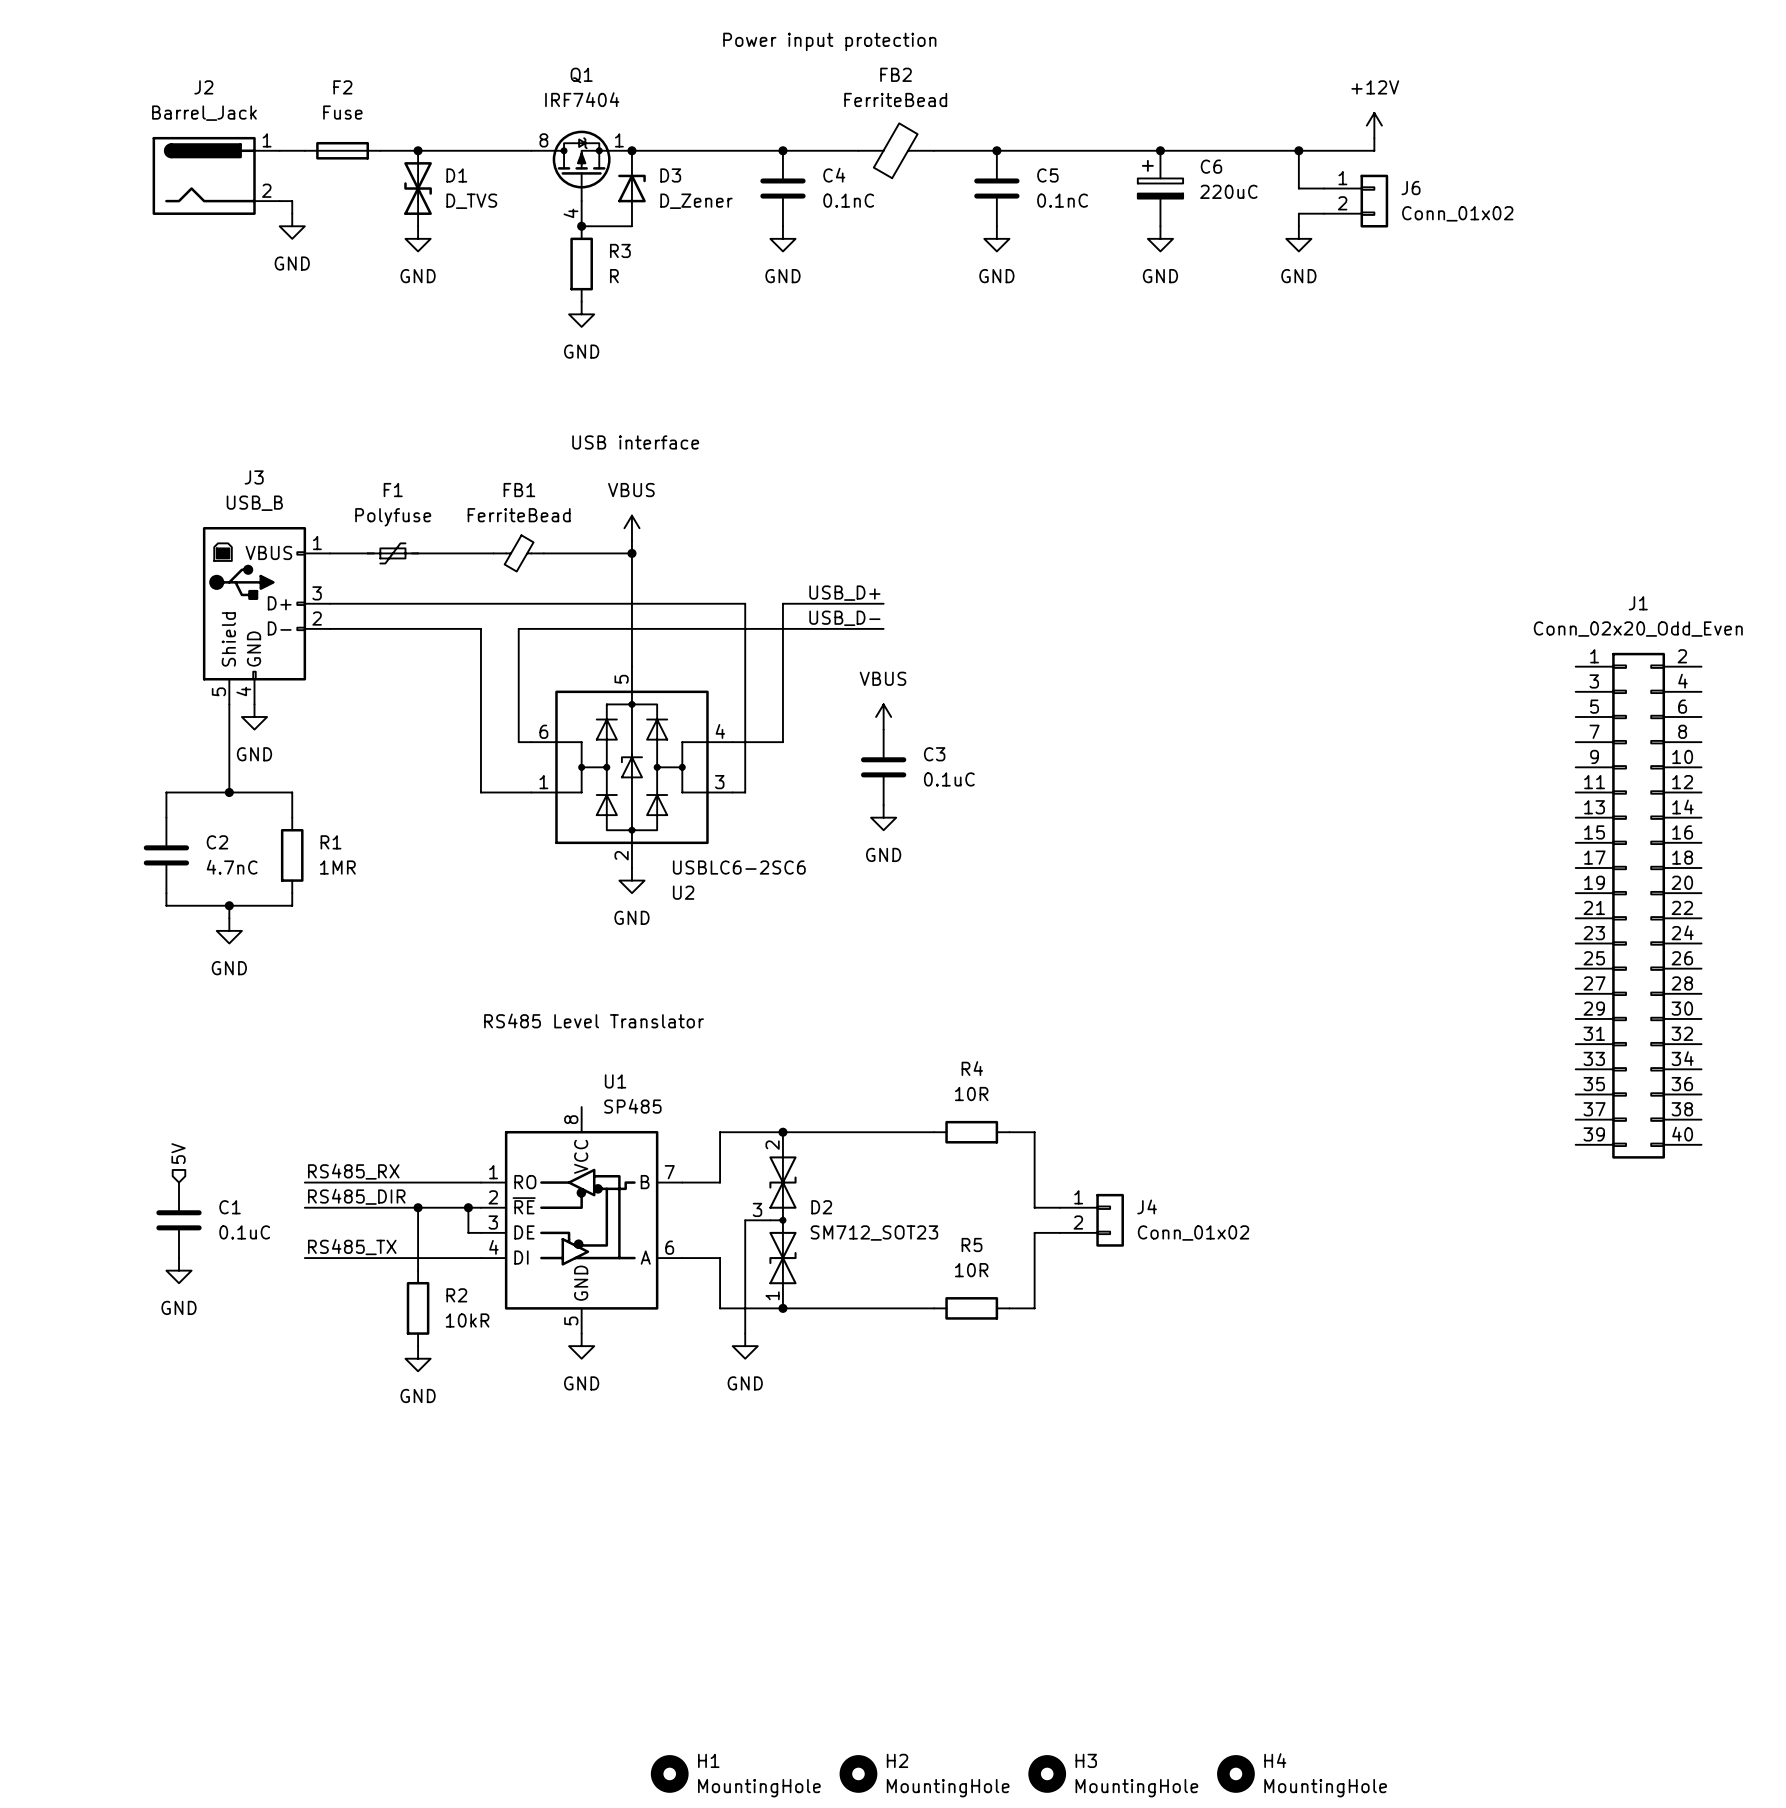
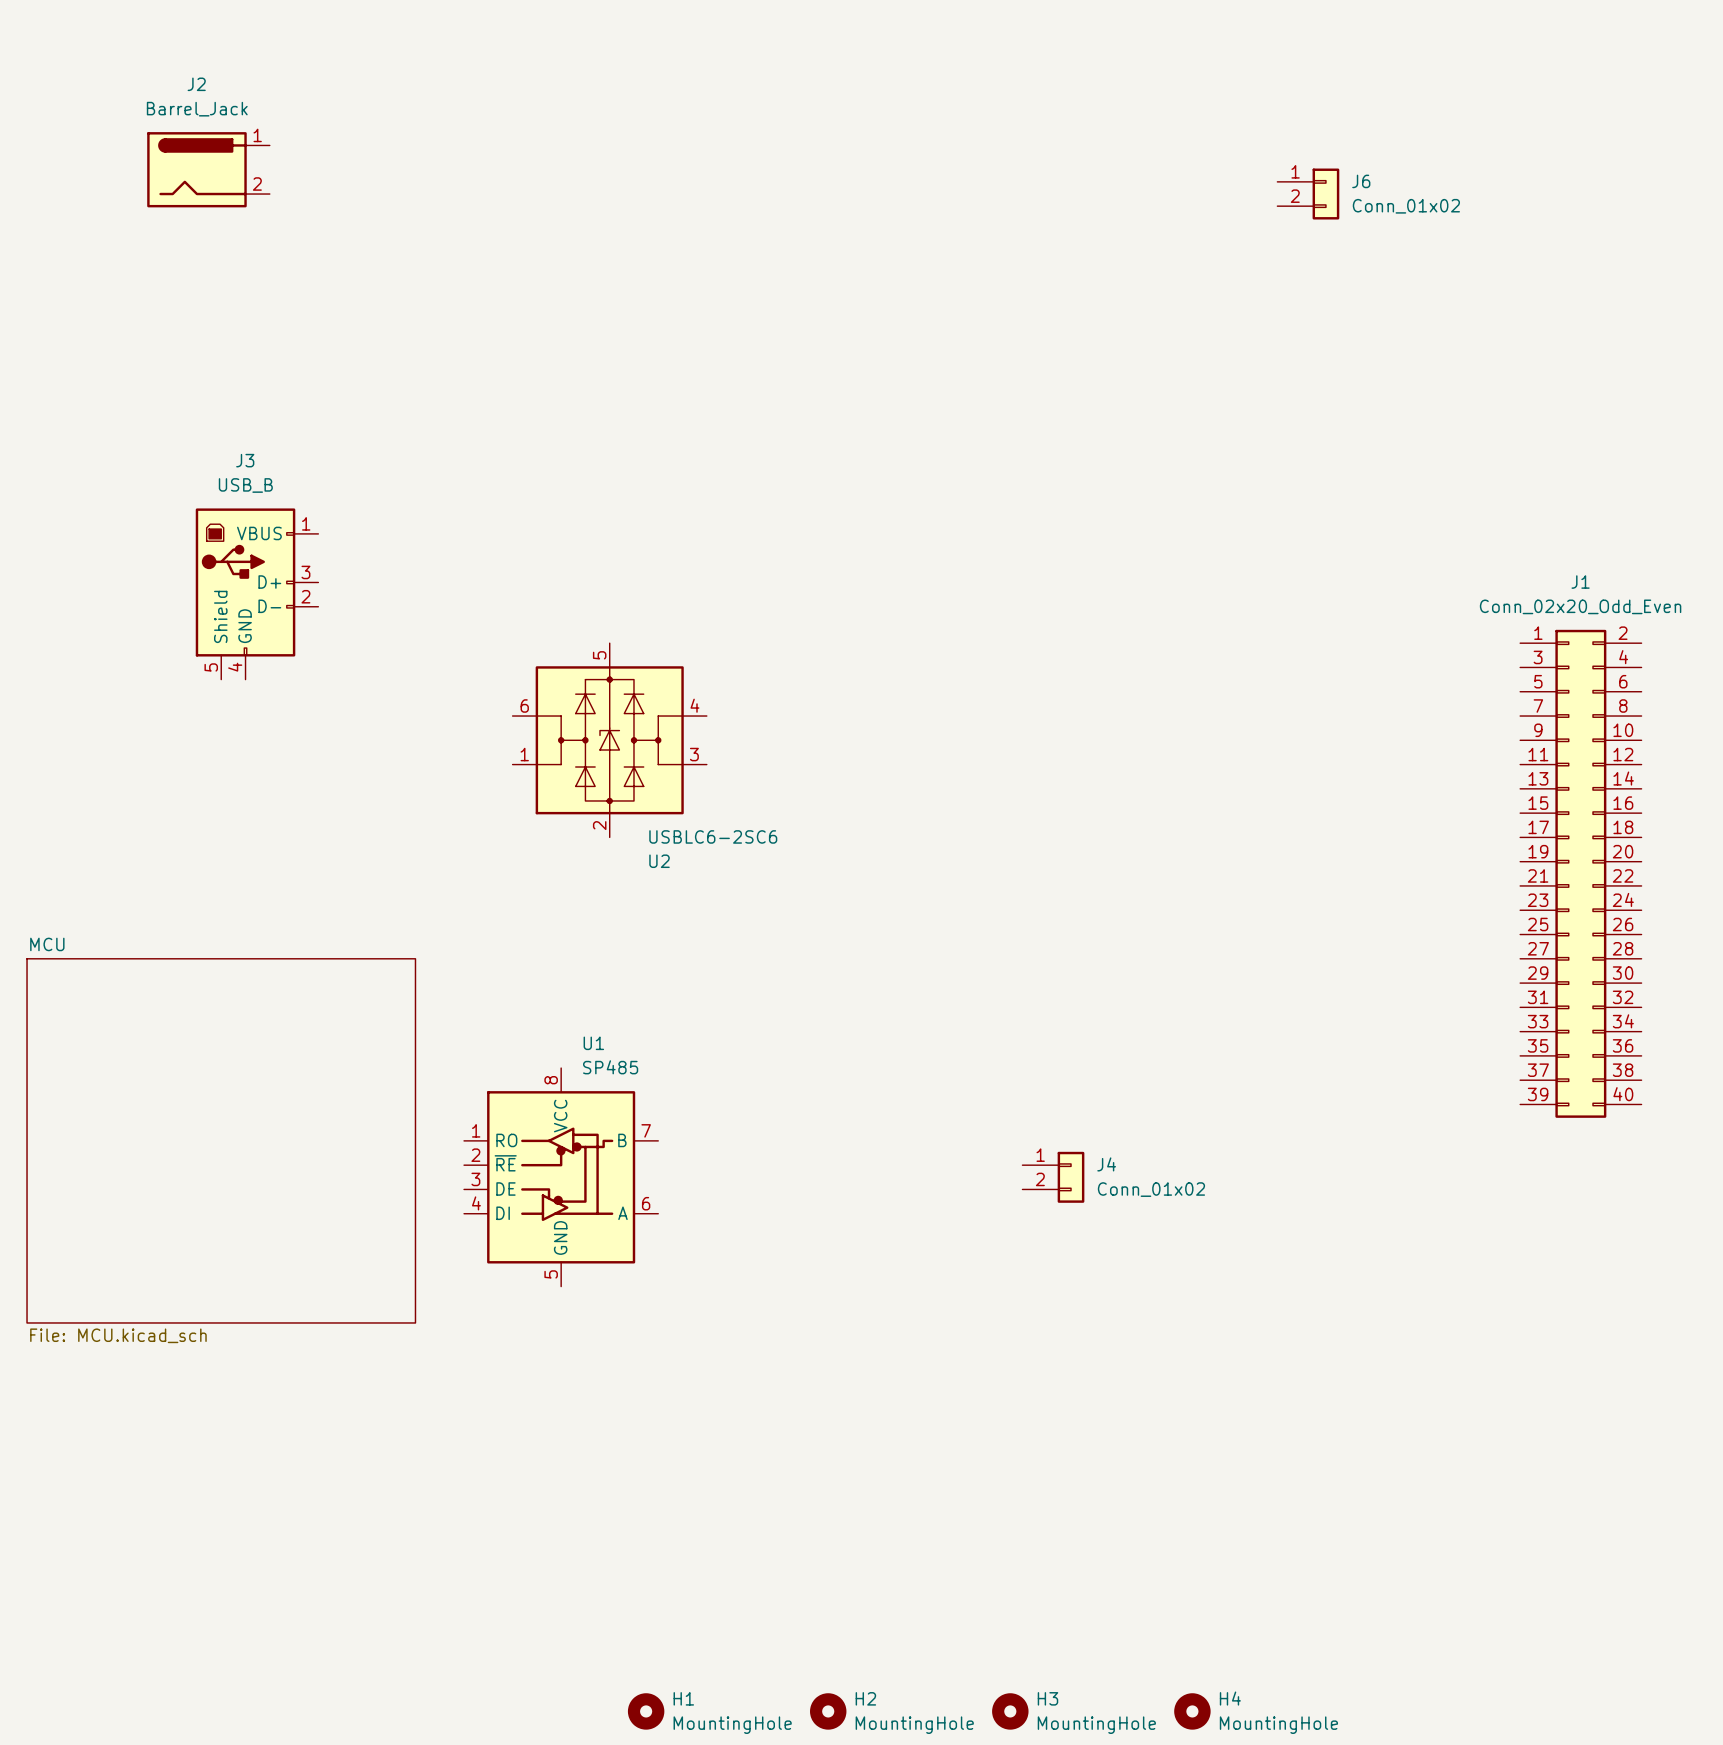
text: Power input protection (829, 41) -> none
power symbol: +12V (1374, 125) -> none
wire: (1374, 138) (1374, 150) (933, 150) -> none
wire: (279, 150) (304, 150) -> none
F2: Fuse (342, 150) -> none
wire: (380, 150) (531, 150) -> none
junction: (418, 150) -> none
wire: (631, 150) (858, 150) -> none
junction: (631, 150) -> none
junction: (782, 150) -> none
FB2: FerriteBead (896, 150) -> none
junction: (996, 150) -> none
junction: (1160, 150) -> none
wire: (1298, 150) (1298, 188) (1324, 188) -> none
junction: (1298, 150) -> none
Q1: IRF7404 (581, 178) -> none
D1: D_TVS (418, 188) -> none
D3: D_Zener (631, 188) -> none
C4: 0.1nC (782, 188) -> none
C5: 0.1nC (996, 188) -> none
C6: 220uC (1160, 188) -> none
wire: (279, 201) (292, 201) (292, 213) -> none
wire: (1324, 213) (1298, 213) (1298, 226) -> none
power symbol: GND (292, 226) -> none
wire: (581, 226) (631, 226) -> none
junction: (581, 226) -> none
power symbol: GND (418, 238) -> none
power symbol: GND (782, 238) -> none
power symbol: GND (996, 238) -> none
power symbol: GND (1160, 238) -> none
power symbol: GND (1298, 238) -> none
R3: R (581, 264) -> none
power symbol: GND (581, 314) -> none
text: USB interface (635, 442) -> none
power symbol: VBUS (631, 528) -> none
wire: (631, 540) (631, 666) -> none
wire: (329, 553) (367, 553) -> none
F1: Polyfuse (392, 553) -> none
wire: (418, 553) (493, 553) -> none
FB1: FerriteBead (518, 553) -> none
wire: (543, 553) (631, 553) -> none
junction: (631, 553) -> none
label: USB_D+ (844, 593) -> none
wire: (329, 603) (745, 603) (745, 792) (732, 792) -> none
wire: (883, 603) (782, 603) (782, 742) (732, 742) -> none
label: USB_D- (844, 618) -> none
wire: (329, 628) (480, 628) (480, 792) (531, 792) -> none
wire: (883, 628) (518, 628) (518, 742) (531, 742) -> none
wire: (229, 704) (229, 792) -> none
power symbol: GND (254, 717) -> none
power symbol: VBUS (883, 717) -> none
C3: 0.1uC (883, 767) -> none
junction: (229, 792) -> none
wire: (166, 817) (166, 792) (292, 792) (292, 817) -> none
power symbol: GND (883, 817) -> none
C2: 4.7nC (166, 855) -> none
R1: 1MR (292, 855) -> none
power symbol: GND (631, 880) -> none
wire: (166, 893) (166, 905) (292, 905) (292, 893) -> none
wire: (229, 905) (229, 918) -> none
junction: (229, 905) -> none
power symbol: GND (229, 930) -> none
text: RS485 Level Translator (594, 1020) -> none
junction: (782, 1132) -> none
wire: (933, 1132) (720, 1132) (720, 1182) (682, 1182) -> none
R4: 10R (971, 1132) -> none
wire: (1009, 1132) (1034, 1132) (1034, 1207) (1059, 1207) -> none
hierarchical label: 5V (178, 1153) -> none
label: RS485_RX (353, 1171) -> none
sheet MCU: none -> File: MCU.kicad_sch (221, 1140)
wire: (304, 1182) (480, 1182) -> none
label: RS485_DIR (356, 1196) -> none
wire: (304, 1207) (480, 1207) -> none
wire: (418, 1207) (418, 1270) -> none
junction: (418, 1207) -> none
wire: (468, 1207) (468, 1232) (480, 1232) -> none
junction: (468, 1207) -> none
C1: 0.1uC (179, 1220) -> none
wire: (745, 1220) (745, 1333) -> none
D2: SM712_SOT23 (770, 1220) -> none
wire: (1059, 1232) (1034, 1232) (1034, 1308) (1009, 1308) -> none
label: RS485_TX (352, 1247) -> none
wire: (304, 1258) (480, 1258) -> none
wire: (682, 1258) (720, 1258) (720, 1308) (933, 1308) -> none
power symbol: GND (179, 1270) -> none
R2: 10kR (418, 1308) -> none
junction: (782, 1308) -> none
R5: 10R (971, 1308) -> none
power symbol: GND (581, 1346) -> none
power symbol: GND (745, 1346) -> none
power symbol: GND (418, 1358) -> none

